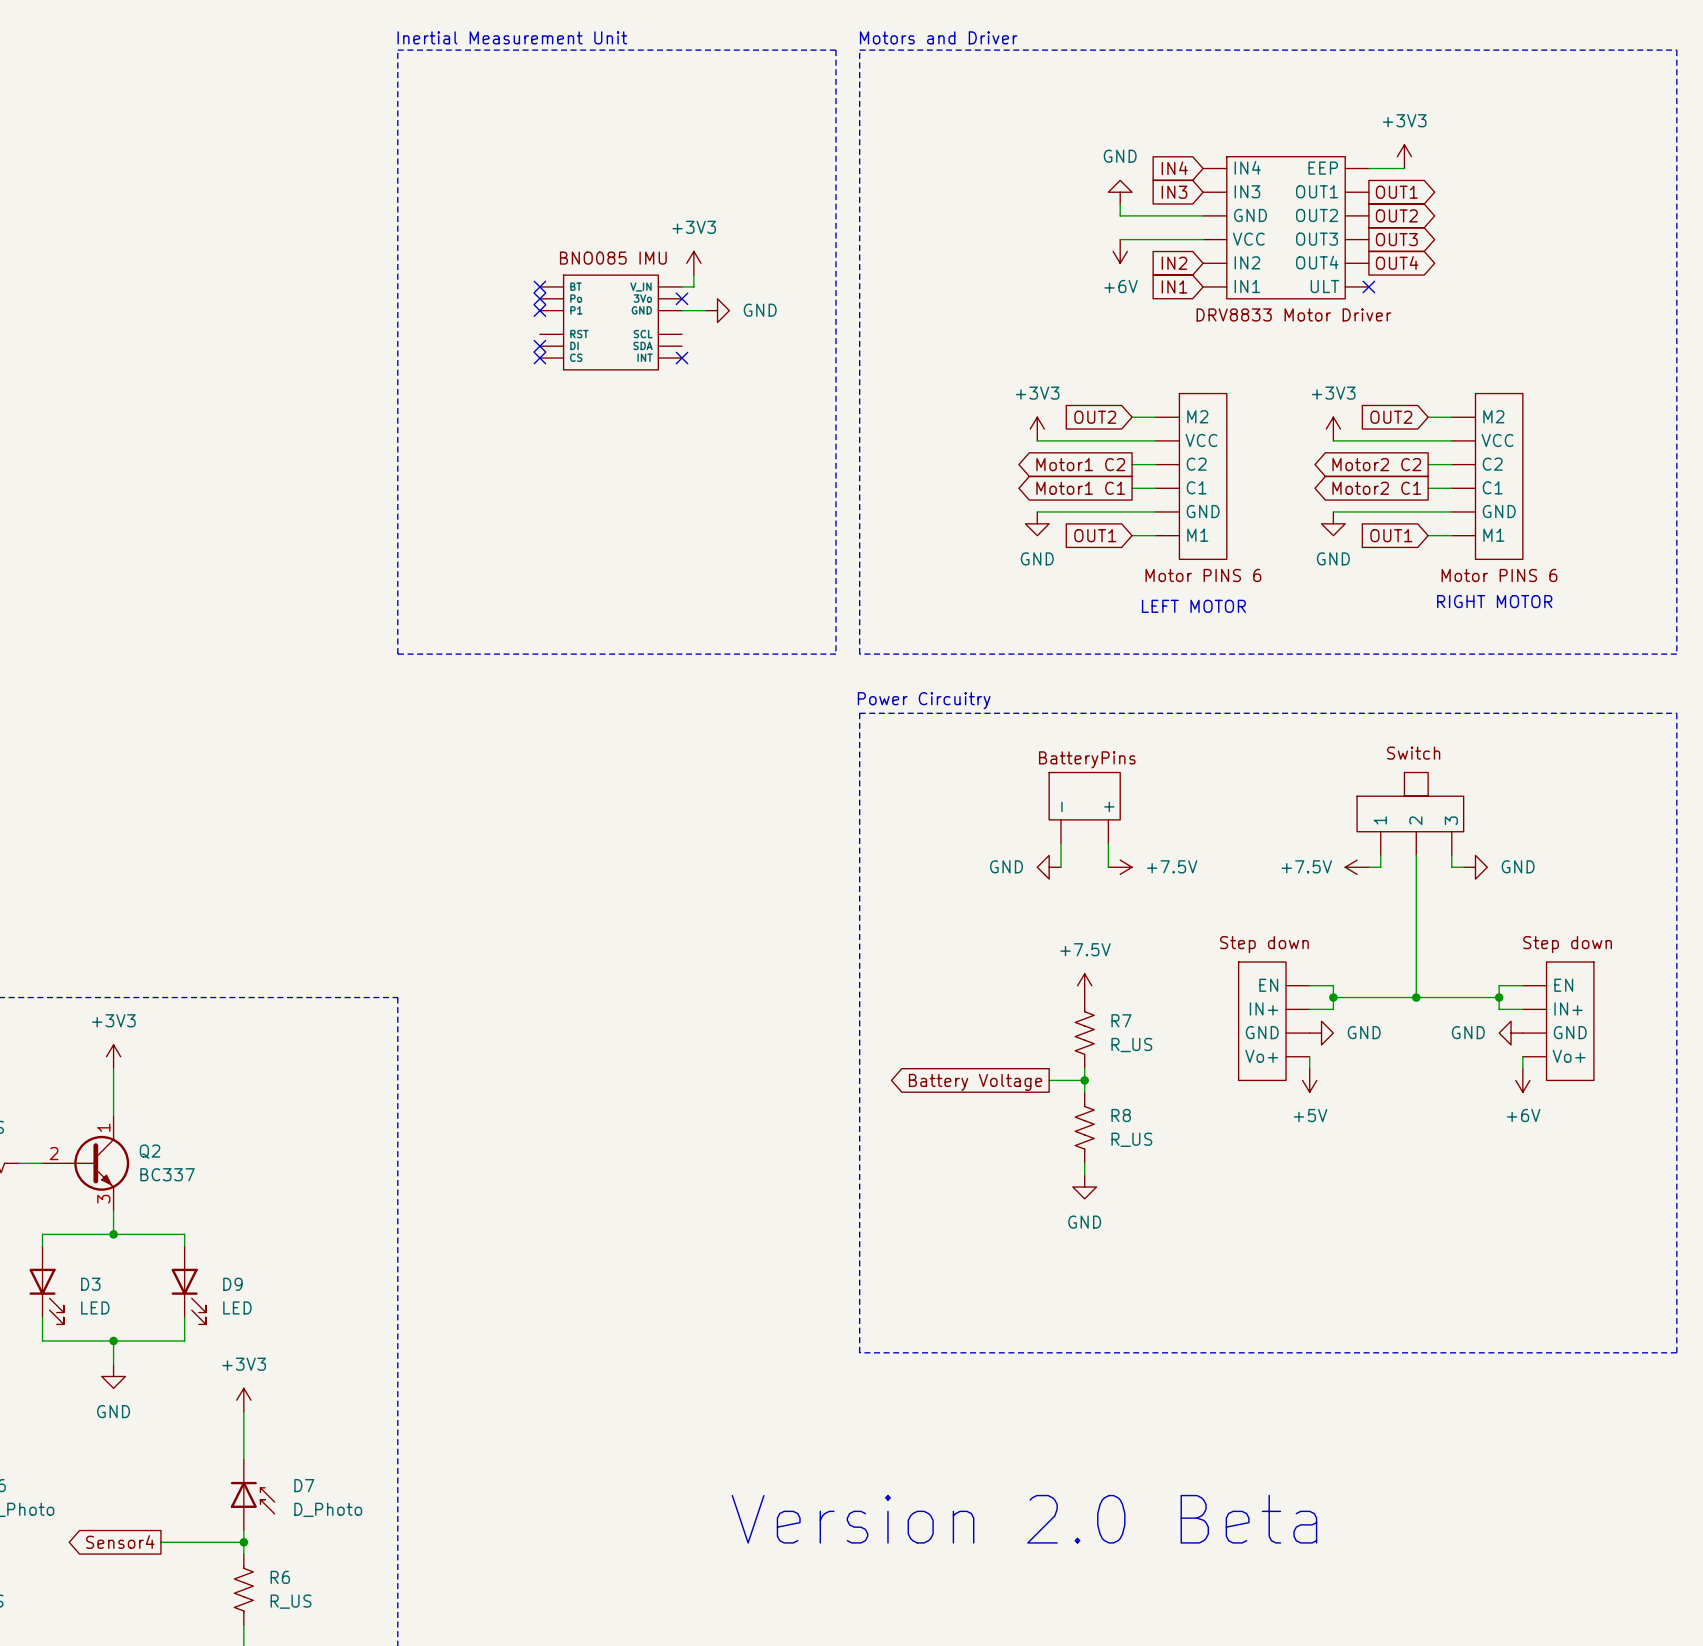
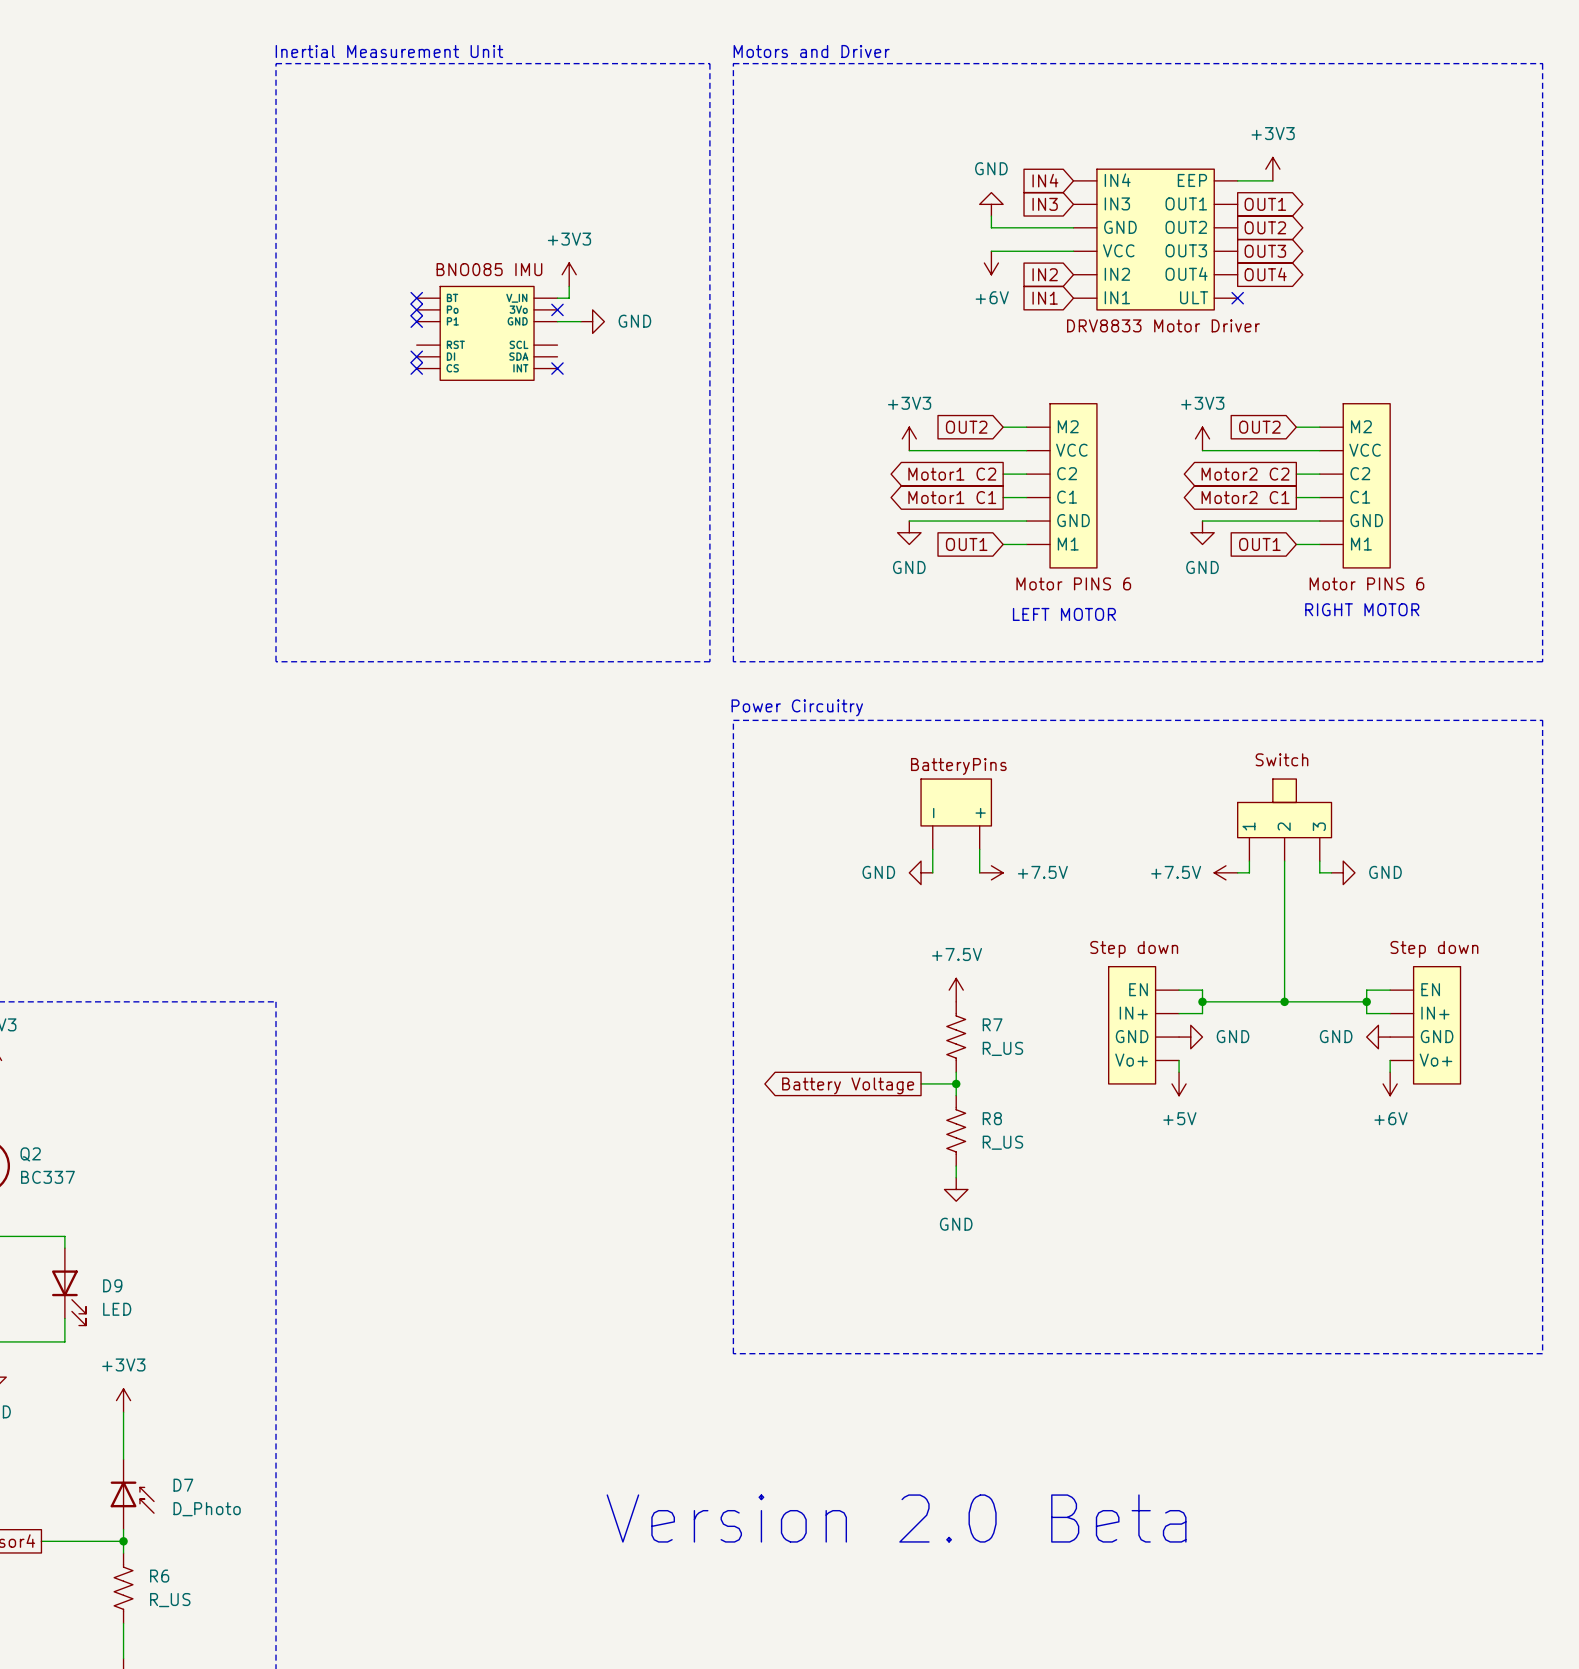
part symbol: [1203, 156, 1369, 299] -> [1073, 169, 1238, 310]
part symbol: [539, 275, 683, 370] -> [416, 286, 558, 381]
part symbol: [1155, 393, 1227, 560] -> [1026, 403, 1097, 568]
part symbol: [1451, 393, 1523, 560] -> [1319, 403, 1391, 568]
part symbol: [1049, 772, 1121, 844] -> [921, 779, 992, 850]
part symbol: [1357, 772, 1464, 856] -> [1237, 779, 1332, 862]
part symbol: [1238, 962, 1310, 1081] -> [1108, 966, 1180, 1084]
part symbol: [1522, 962, 1594, 1081] -> [1390, 966, 1461, 1084]

